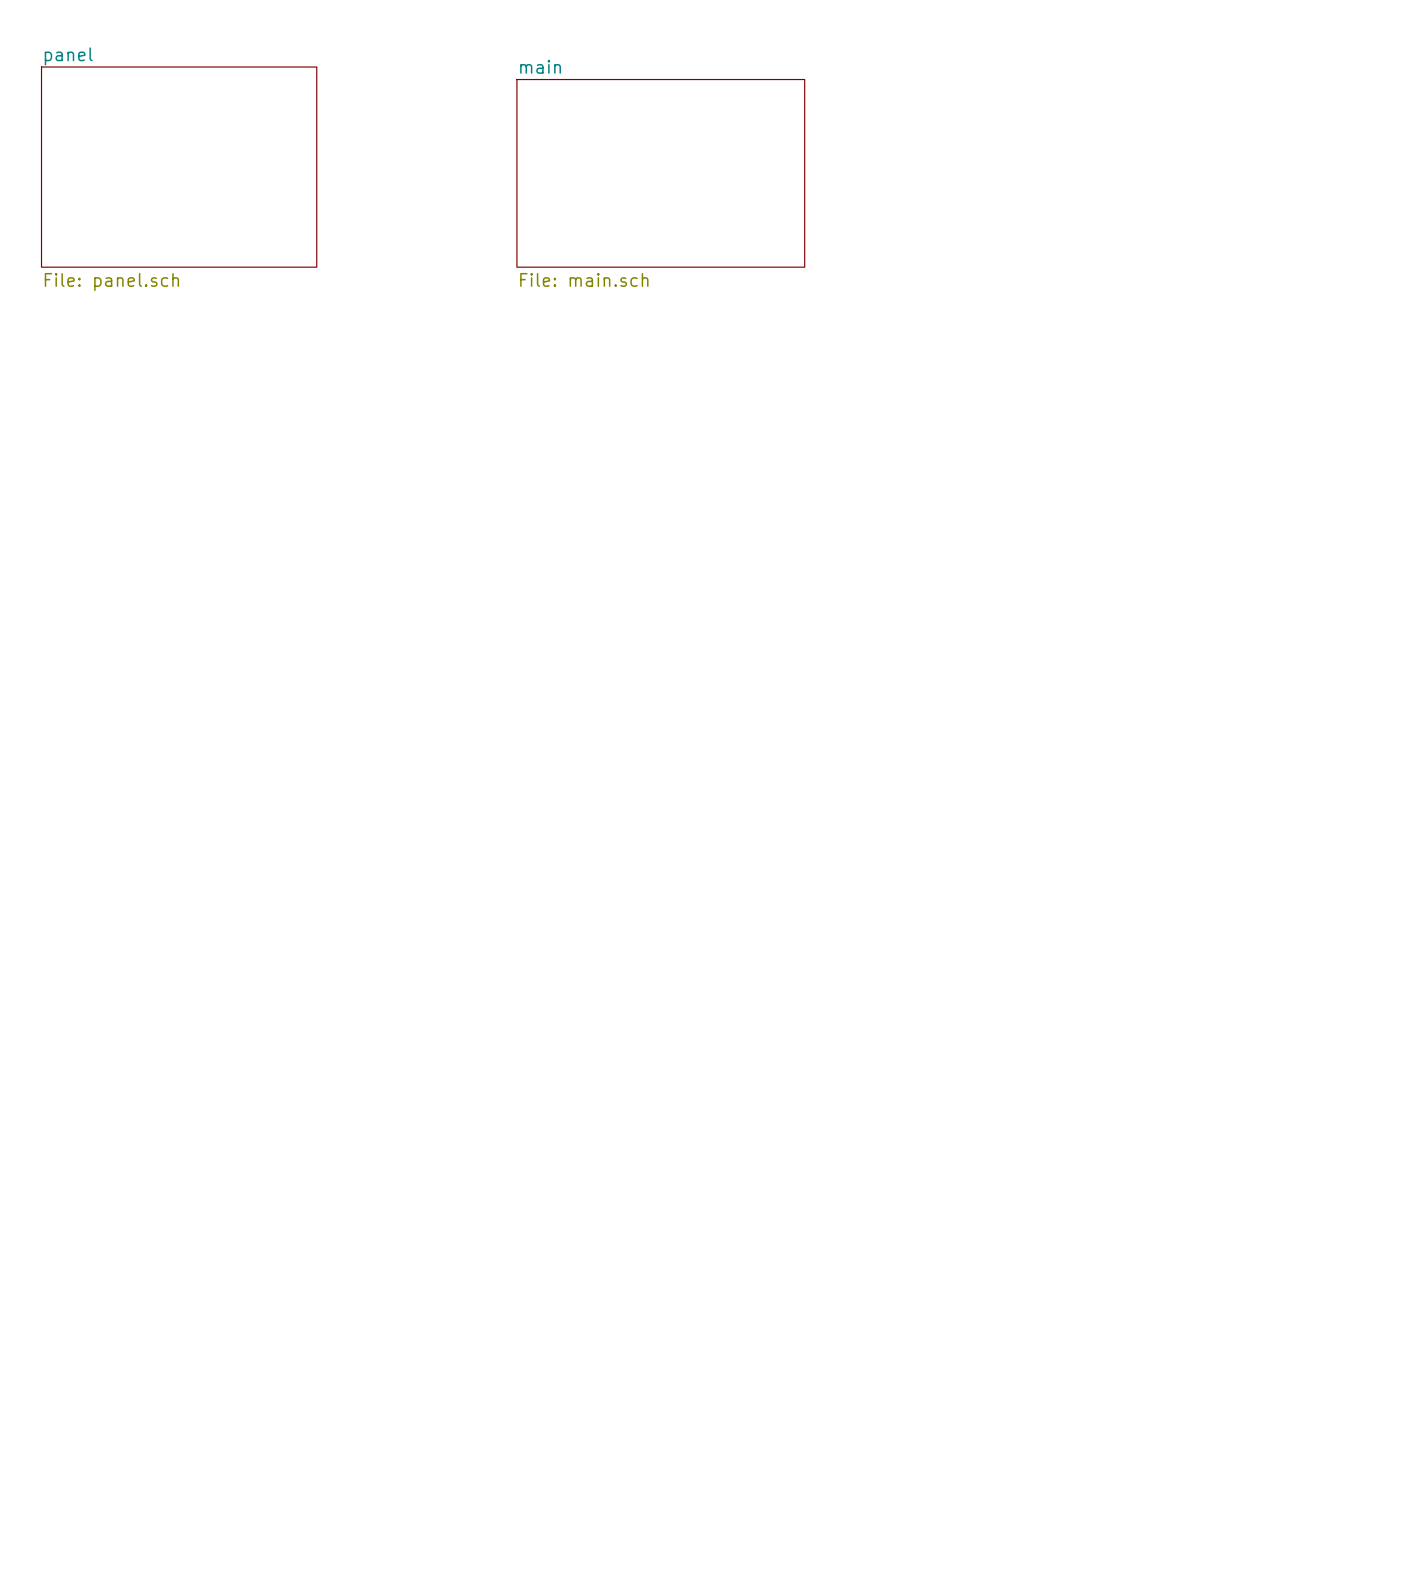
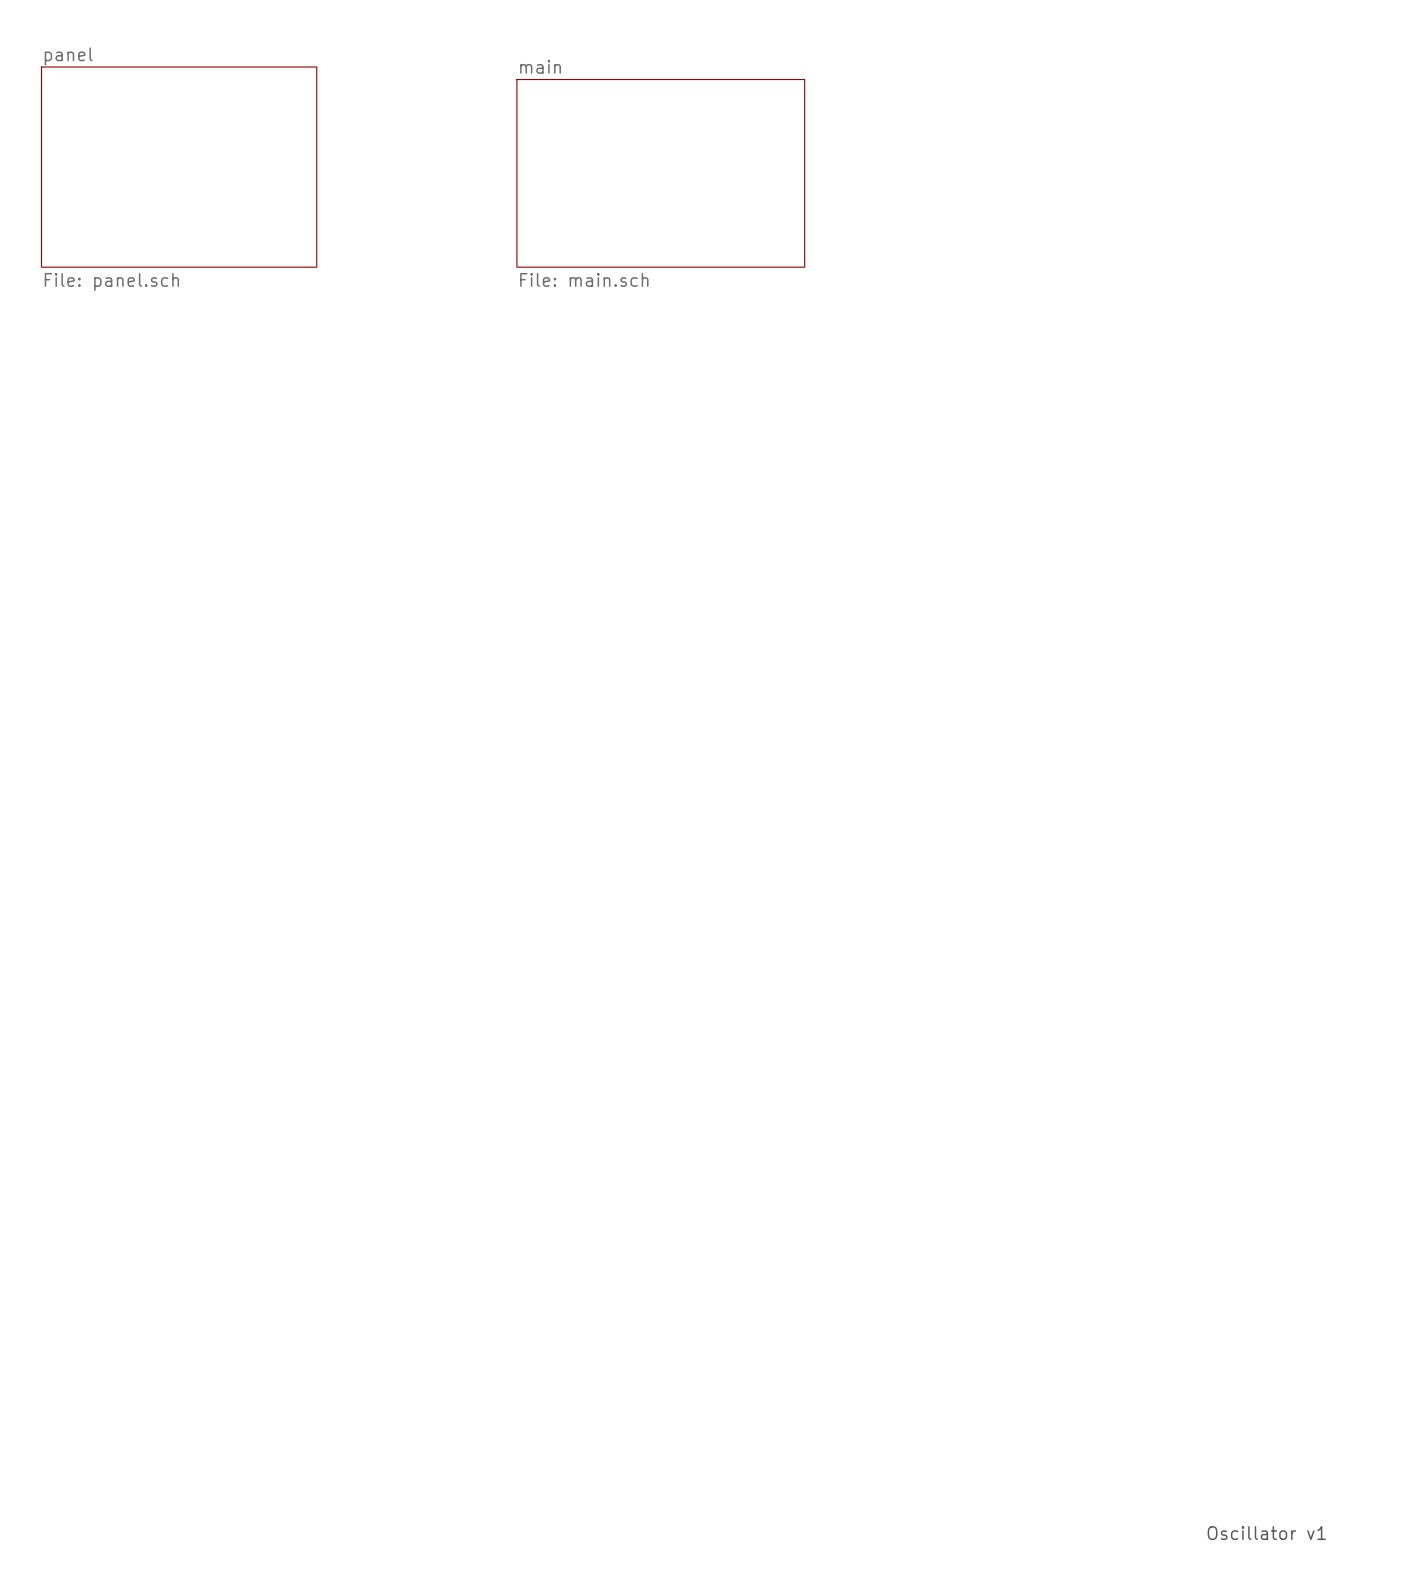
text: none -> Oscillator v1 (1266, 1533)

